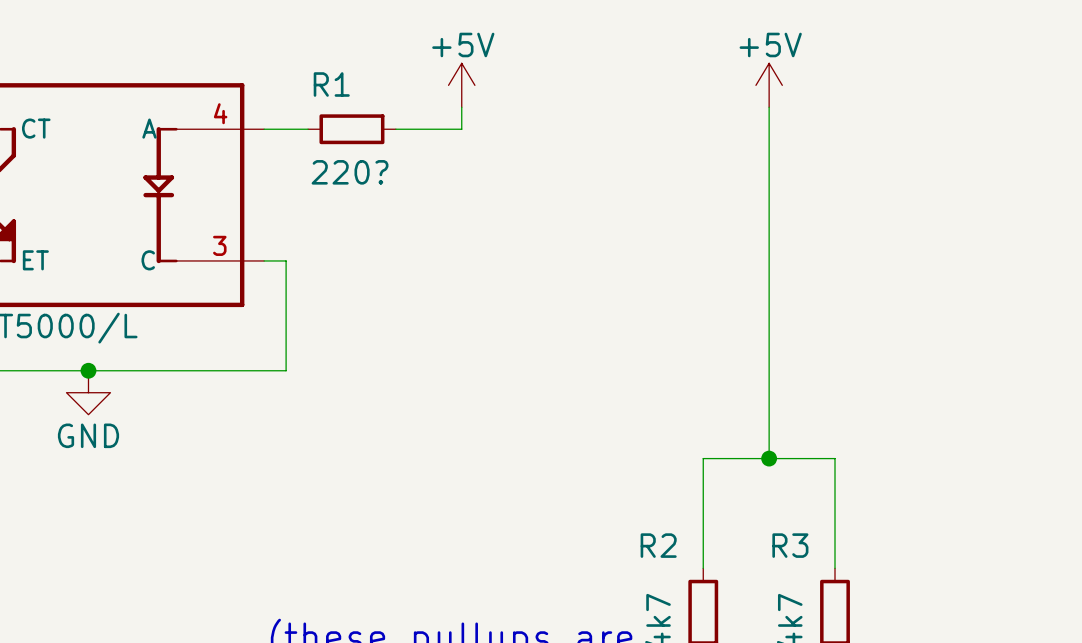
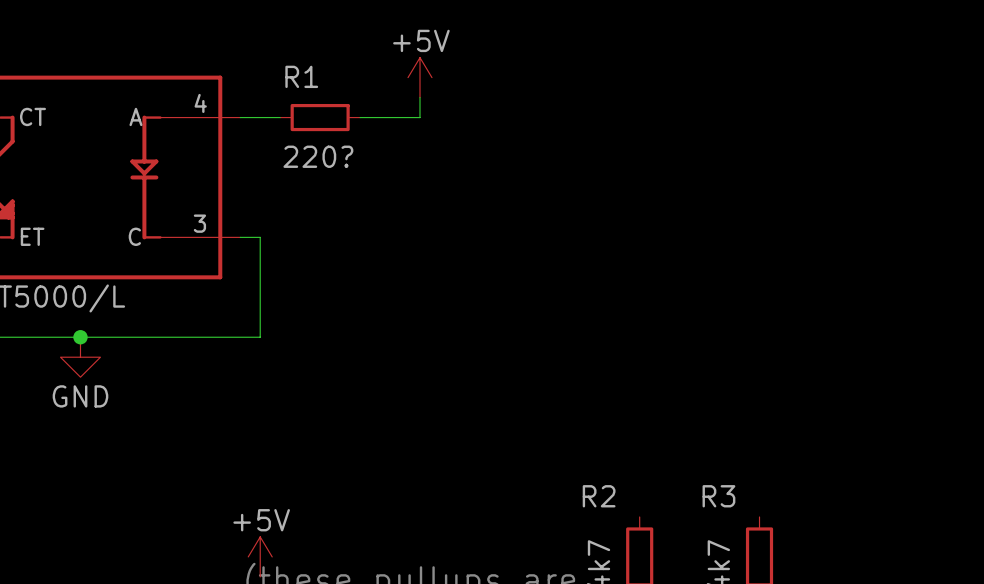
power symbol: +5V (769, 85) -> none
wire: (769, 107) (769, 458) -> none
junction: (769, 458) -> none
wire: (703, 568) (703, 458) (835, 458) (835, 568) -> none
power symbol: none -> +5V (260, 556)

